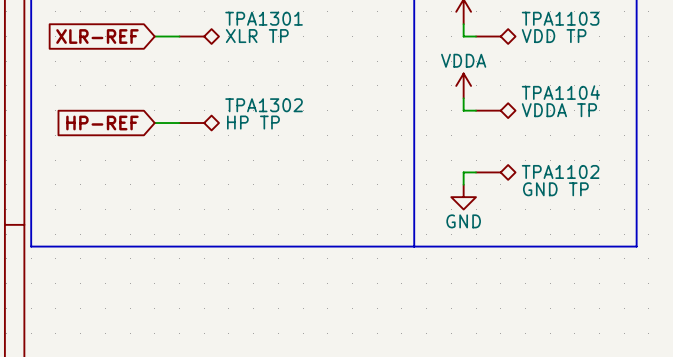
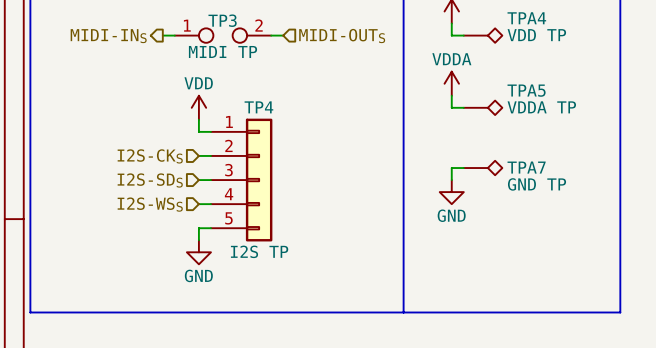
TPA1103 name: TPA1103 (560, 18) -> TPA4 (526, 18)
global label: XLR-REF (97, 36) -> none
hierarchical label: none -> MIDI-INS (108, 36)
wire: (154, 36) (167, 36) -> (271, 35) (283, 35)
TPA1301: XLR TP (199, 36) -> none
TP3: none -> MIDI TP (223, 35)
hierarchical label: none -> MIDI-OUTS (342, 36)
TPA1104 name: TPA1104 (560, 92) -> TPA5 (526, 90)
power symbol: none -> VDD (198, 107)
global label: HP-REF (102, 123) -> none
wire: (154, 123) (179, 123) -> none
TPA1302: HP TP (199, 123) -> none
wire: none -> (198, 119) (198, 131) (210, 131)
hierarchical label: none -> I2S-CKS (150, 156)
wire: none -> (198, 155) (210, 155)
TPA1102 name: TPA1102 (560, 171) -> TPA7 (526, 167)
wire: none -> (198, 180) (210, 180)
TP4: none -> I2S TP (241, 180)
hierarchical label: none -> I2S-SDS (150, 180)
hierarchical label: none -> I2S-WSS (150, 204)
wire: none -> (198, 204) (210, 204)
wire: none -> (210, 228) (198, 228) (198, 240)
line: (31, 246) (636, 246) -> (30, 240) (30, 312) (620, 312) (620, 240)
line: none -> (403, 240) (403, 312)
power symbol: none -> GND (198, 252)

